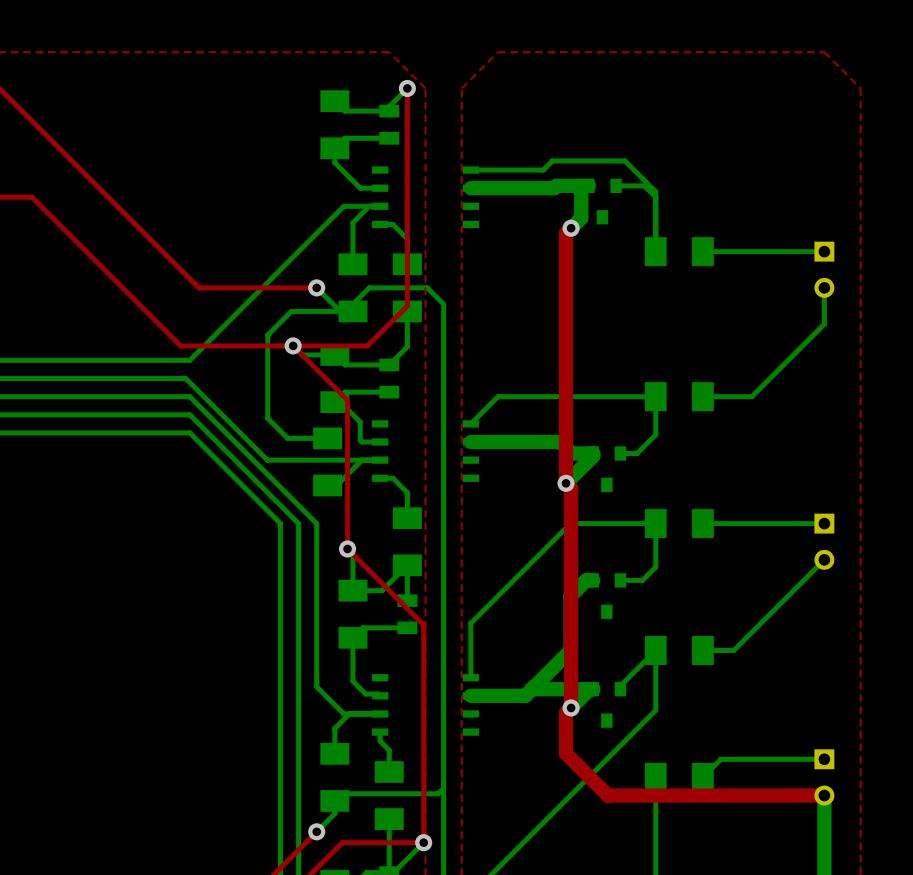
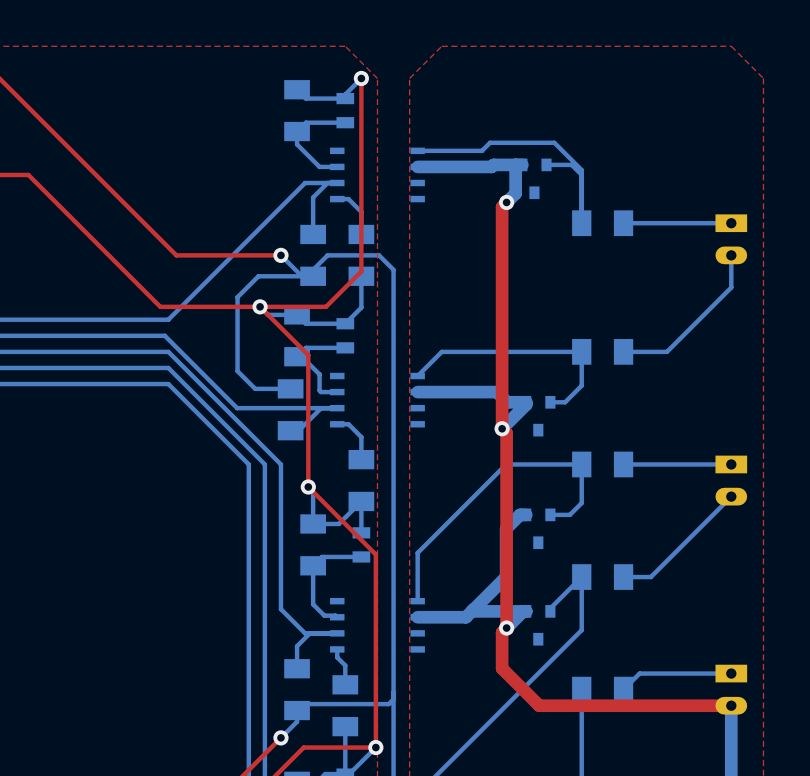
part footprint: [814, 241, 835, 298] -> [715, 214, 748, 265]
part footprint: [814, 513, 835, 570] -> [715, 455, 748, 506]
part footprint: [814, 749, 835, 806] -> [715, 664, 748, 715]

